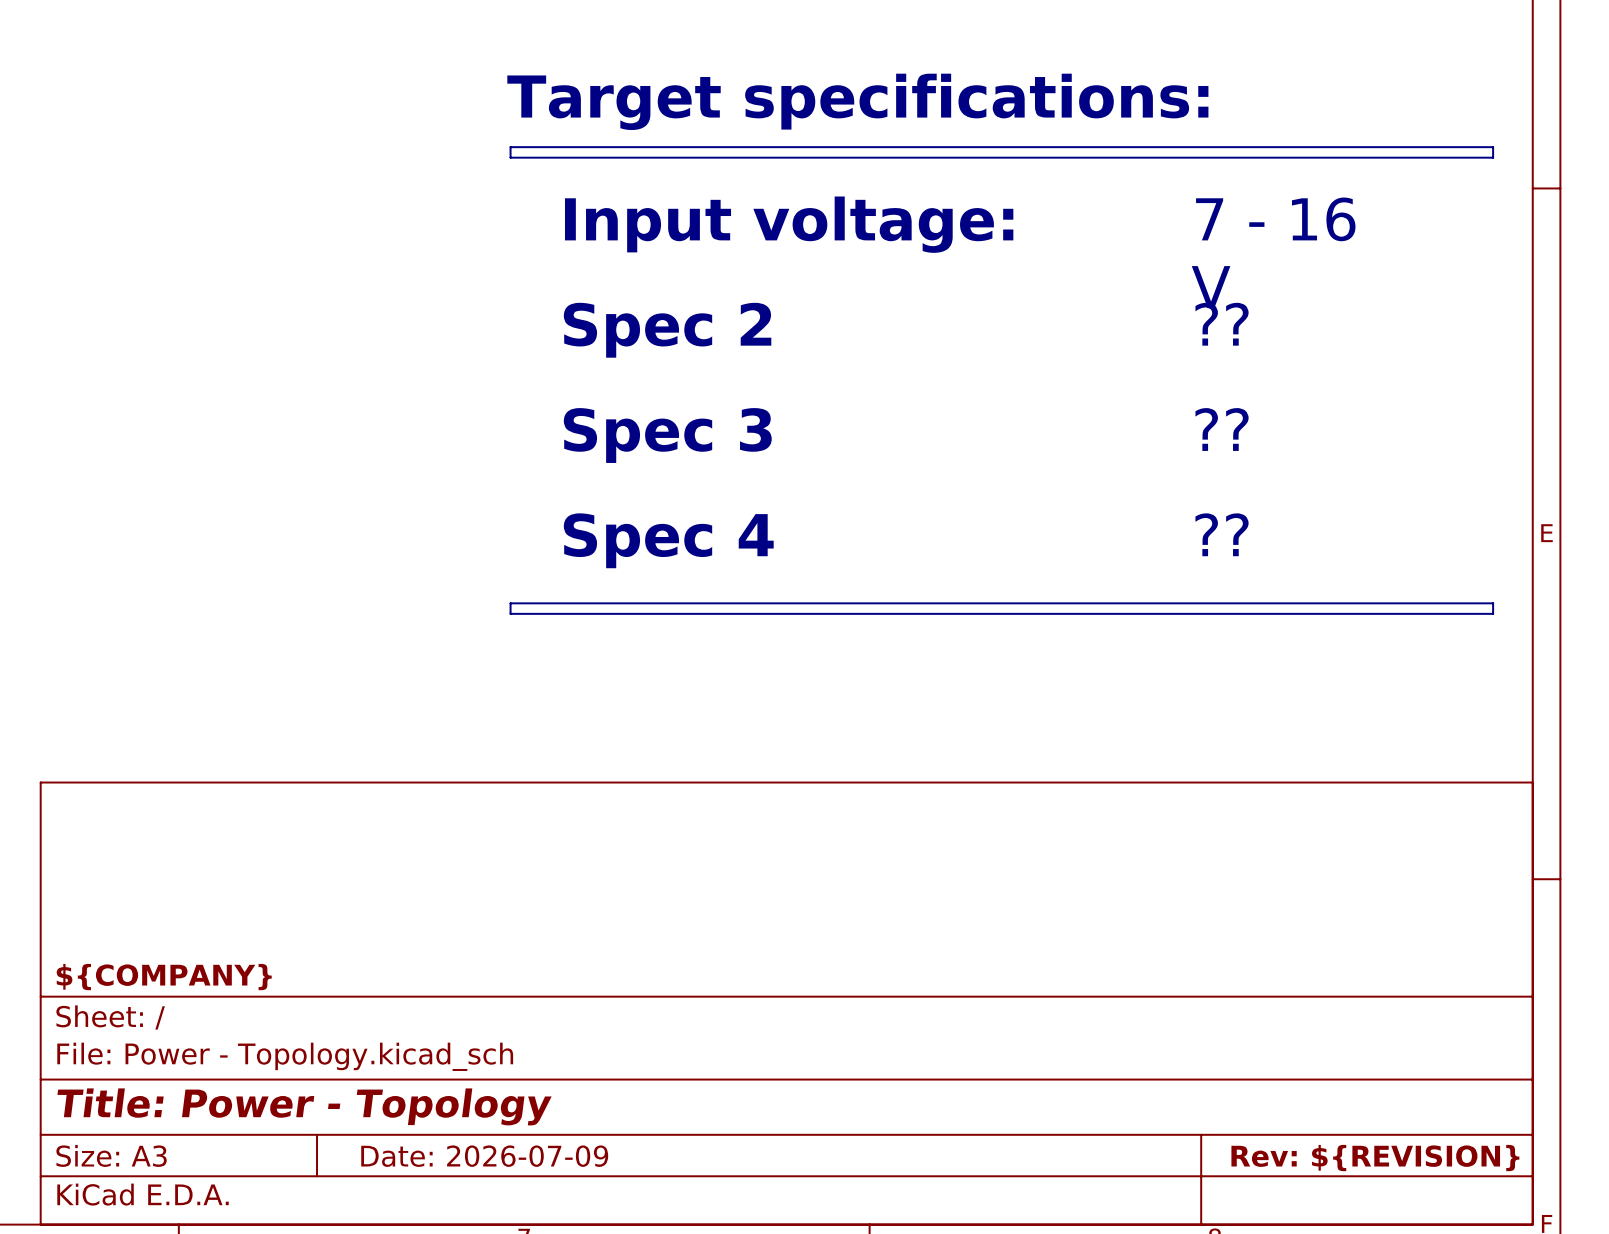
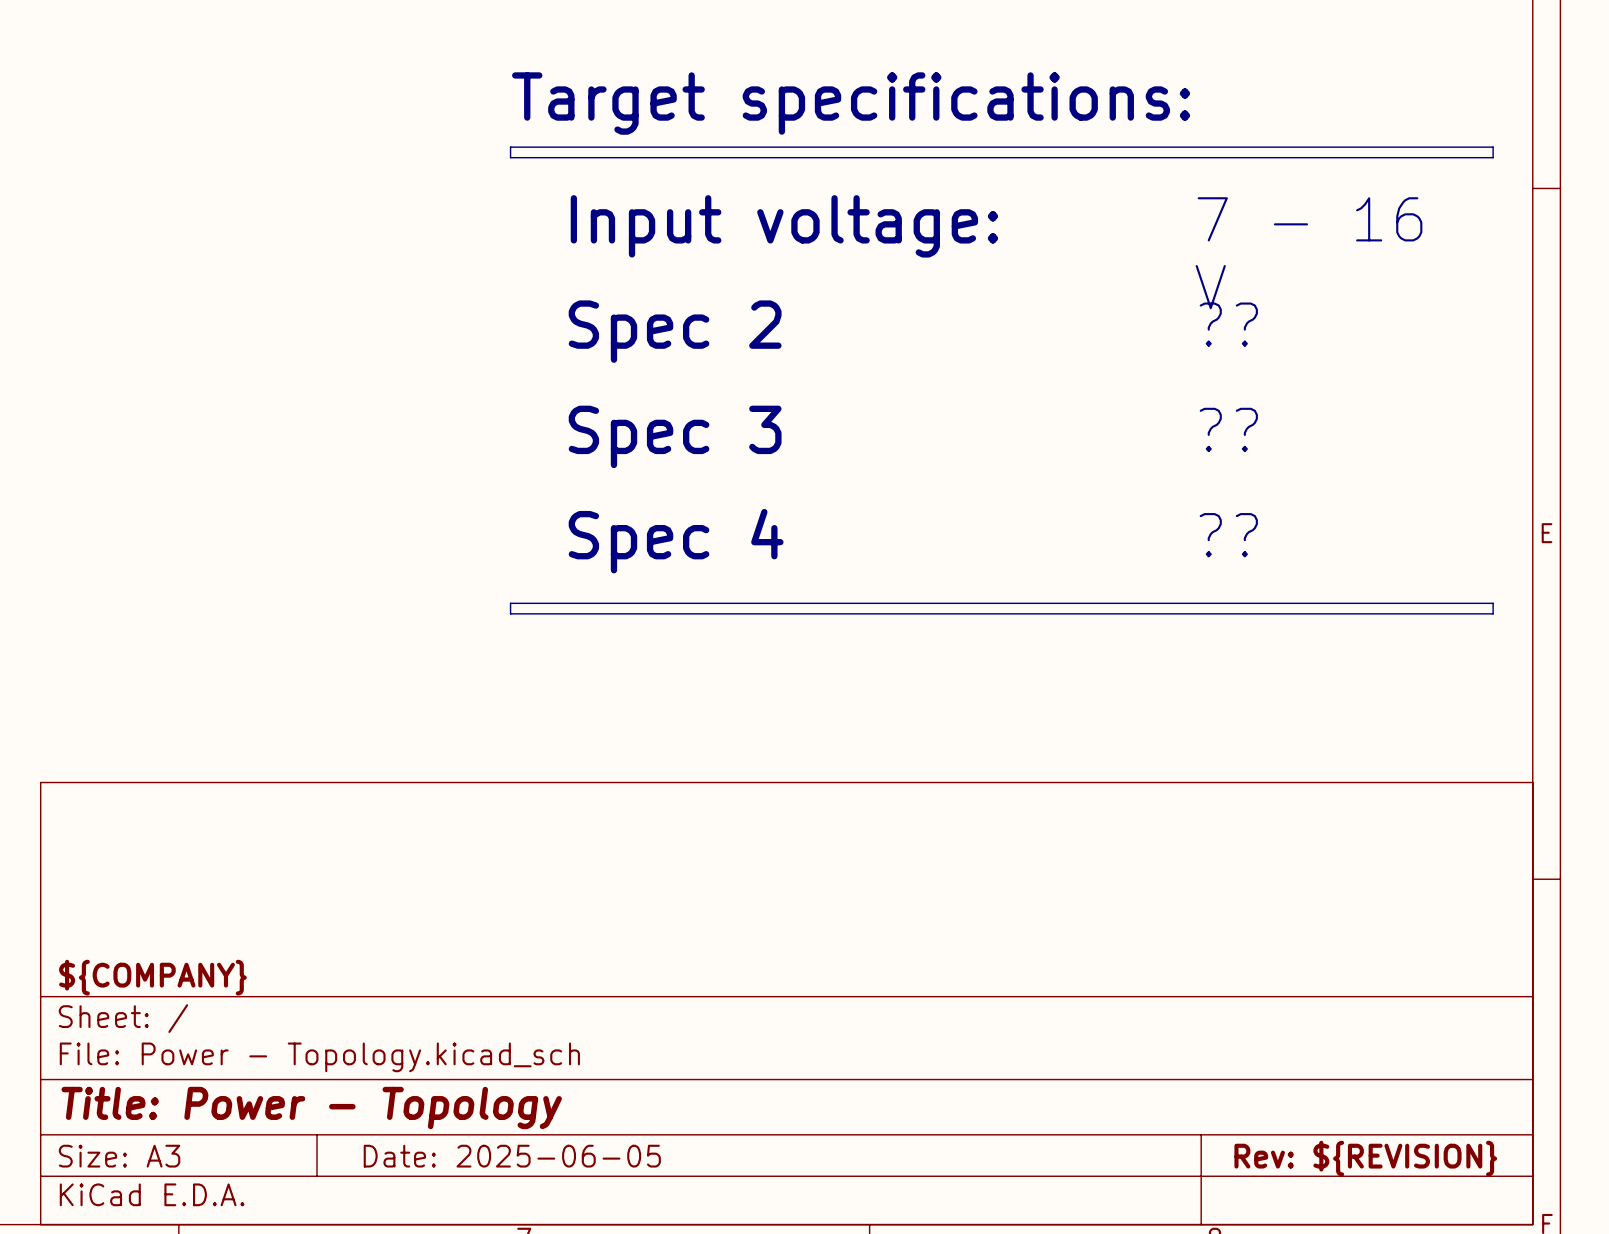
title block: Date: 2026-07-09 (484, 1156) -> Date: 2025-06-05 (512, 1156)

